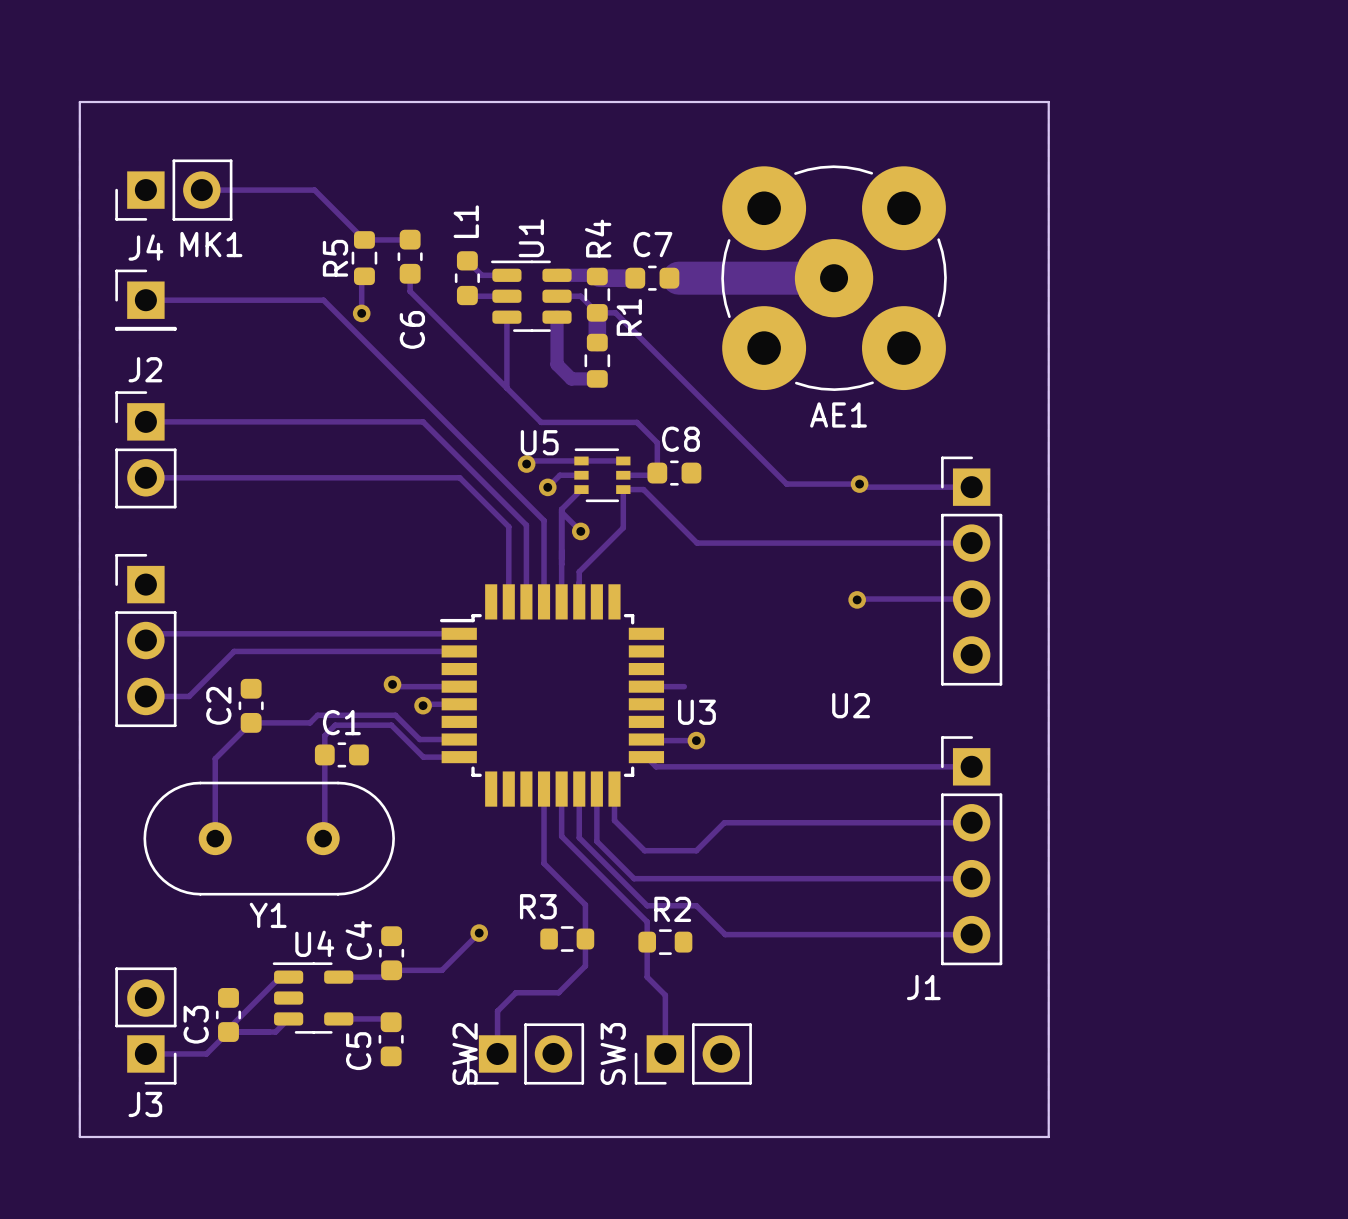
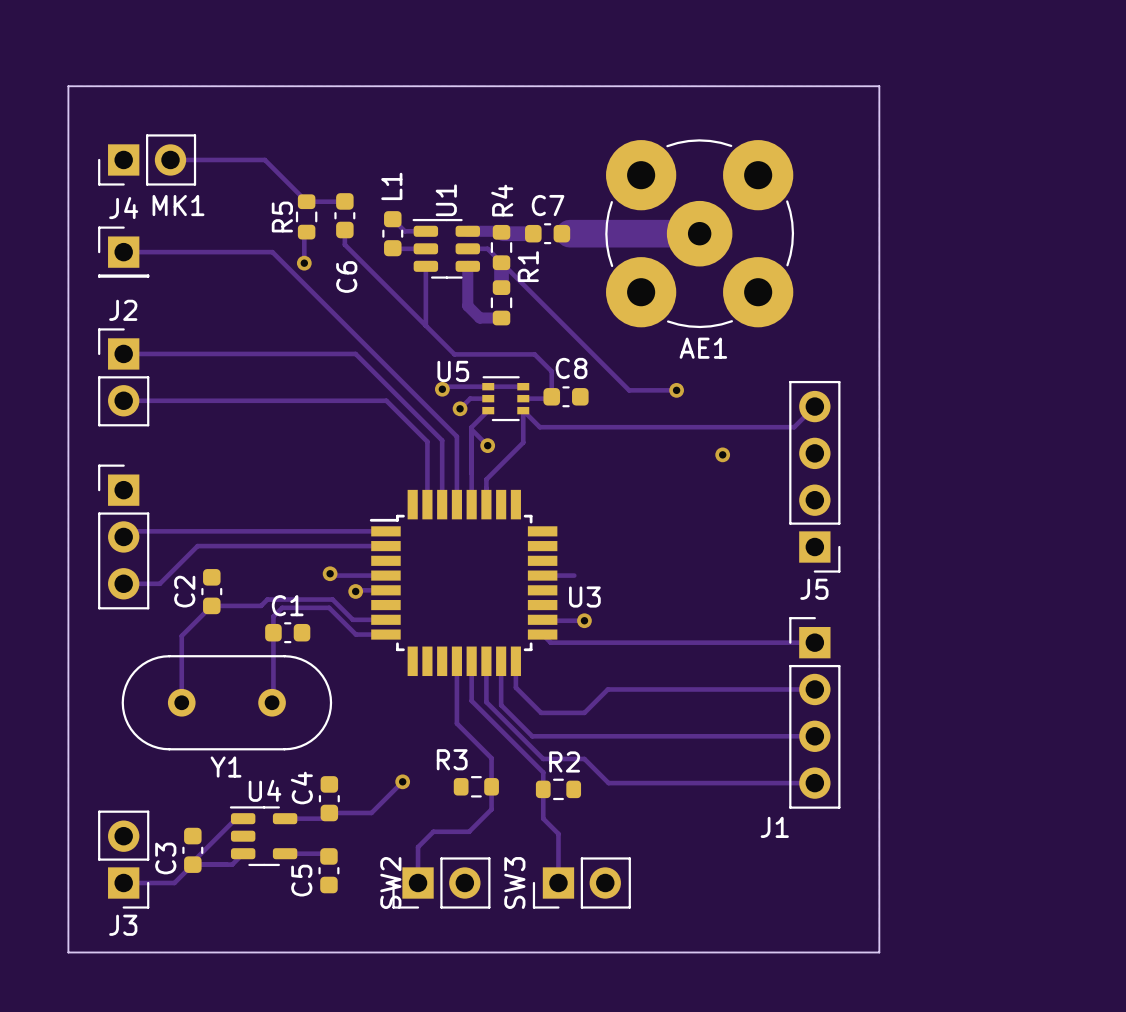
track: (597, 312) (615, 312) (786, 484) (859, 484) (862, 487) (971, 487) -> (501, 262) (629, 390) (676, 390)
via: none -> (676, 390)
via: (859, 484) -> none
track: (623, 489) (643, 489) (697, 543) (971, 543) -> (523, 410) (539, 427) (794, 427) (814, 406)
via: none -> (722, 454)
J5: none -> (814, 476)
U2: (971, 571) -> none
via: (857, 599) -> none
track: (971, 599) (857, 599) -> none

